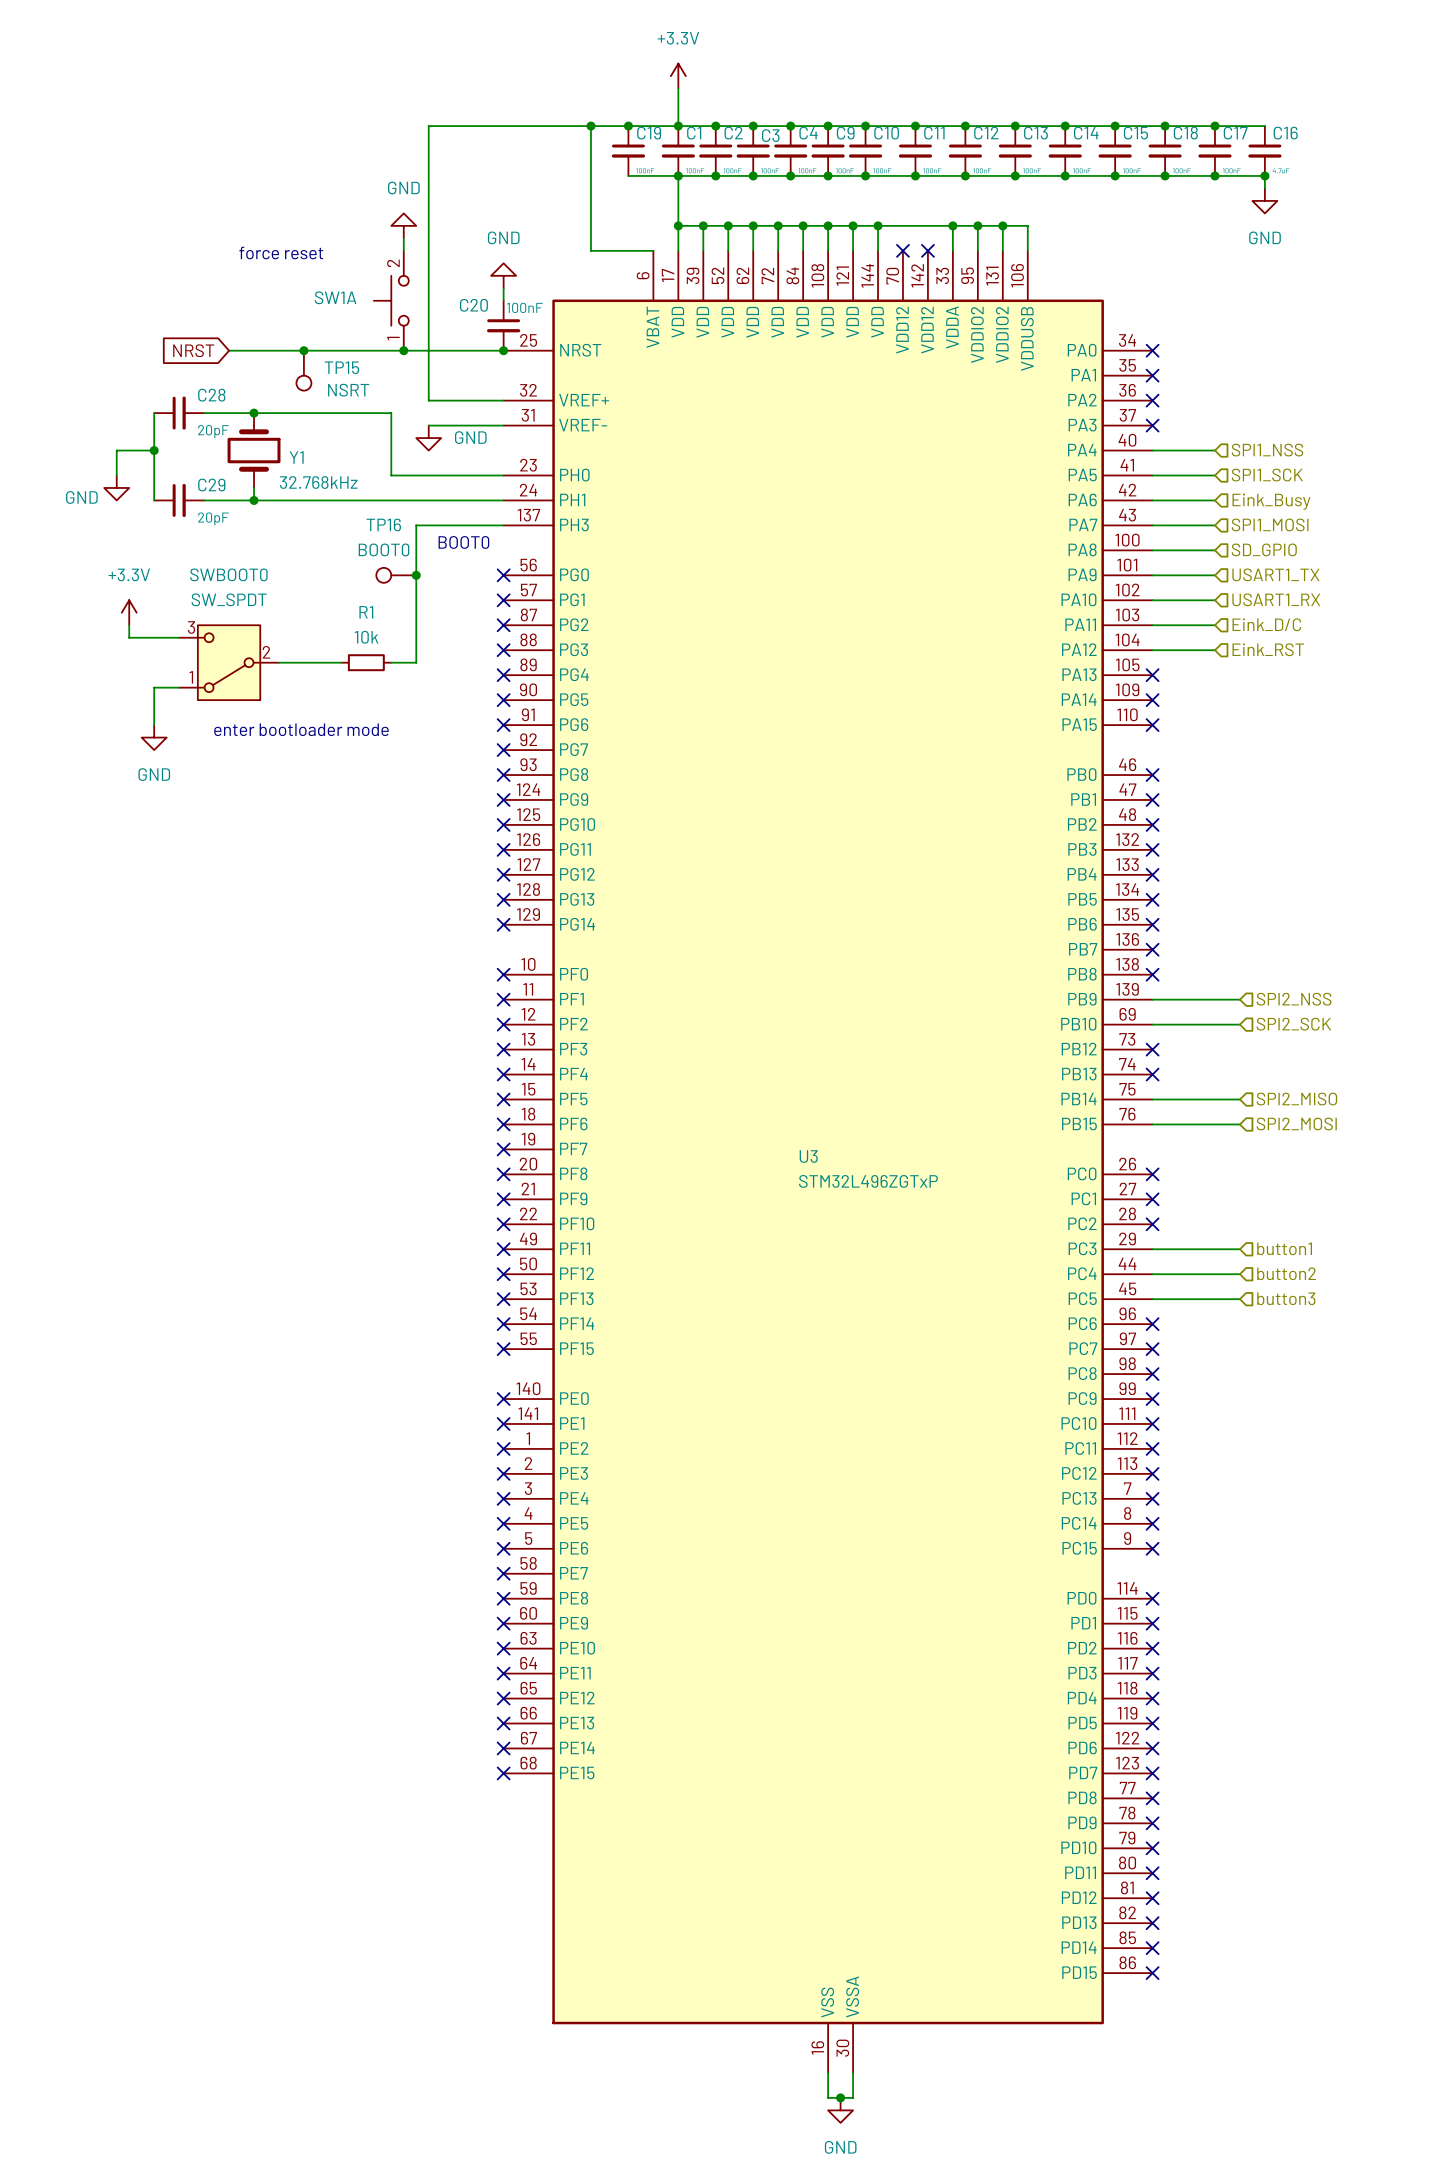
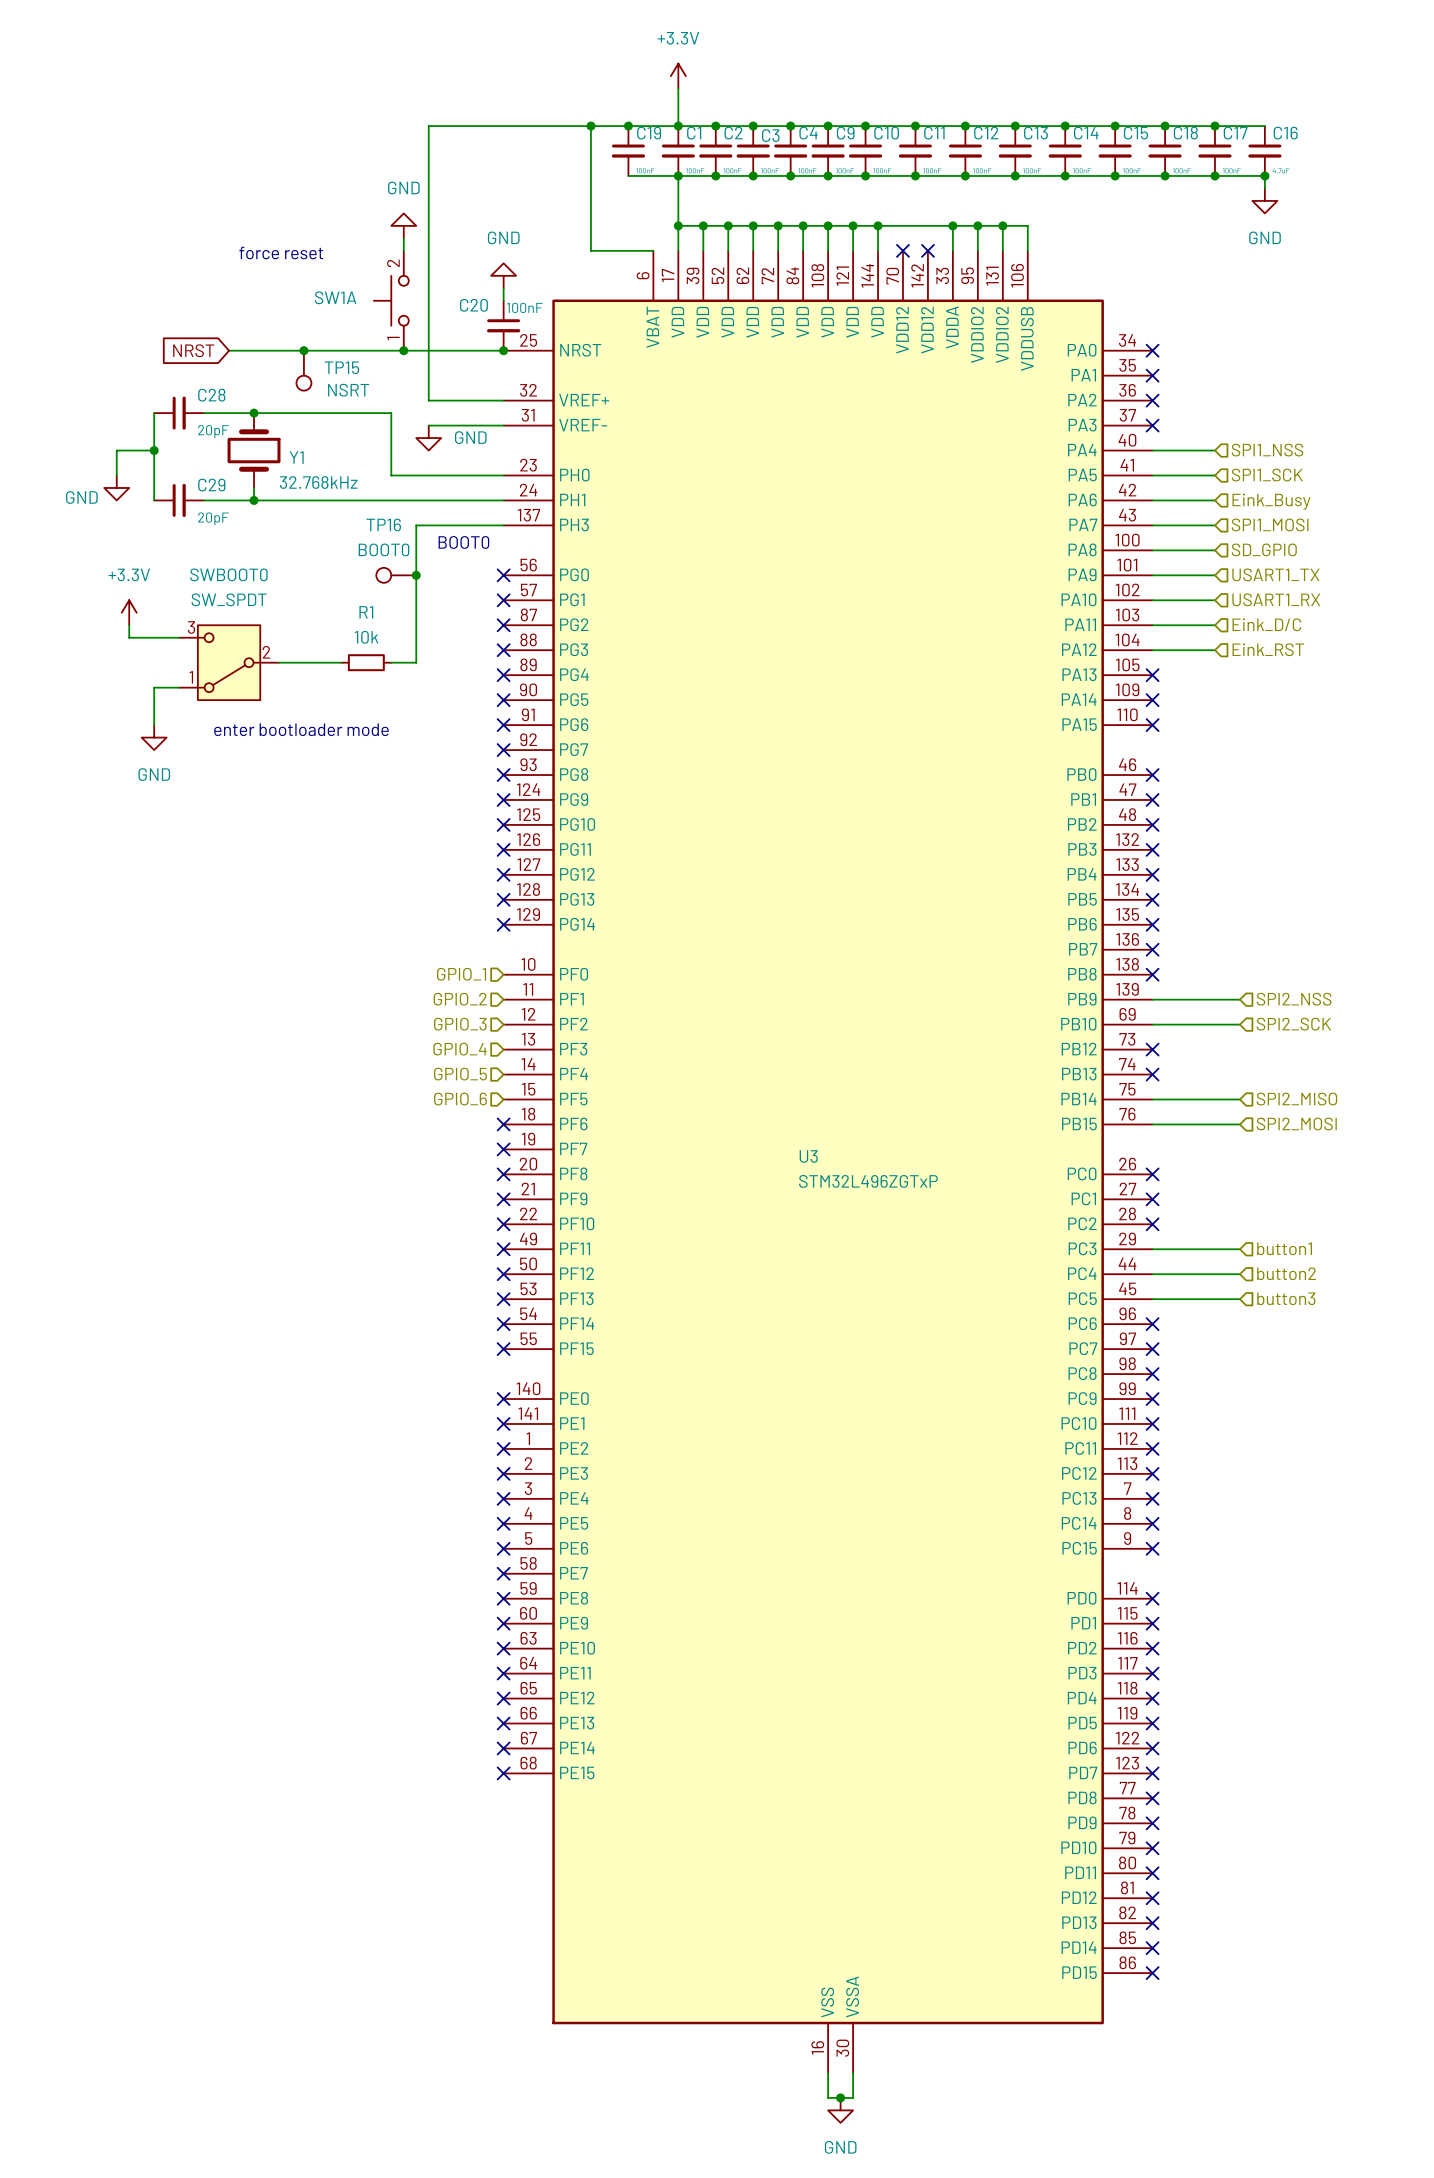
hierarchical label: none -> GPIO_1 (461, 974)
no-connect mark: (503, 974) -> none
hierarchical label: none -> GPIO_2 (460, 999)
no-connect mark: (503, 999) -> none
hierarchical label: none -> GPIO_3 (460, 1024)
no-connect mark: (503, 1024) -> none
hierarchical label: none -> GPIO_4 (460, 1049)
no-connect mark: (503, 1049) -> none
hierarchical label: none -> GPIO_5 (460, 1074)
no-connect mark: (503, 1074) -> none
hierarchical label: none -> GPIO_6 (460, 1099)
no-connect mark: (503, 1099) -> none

